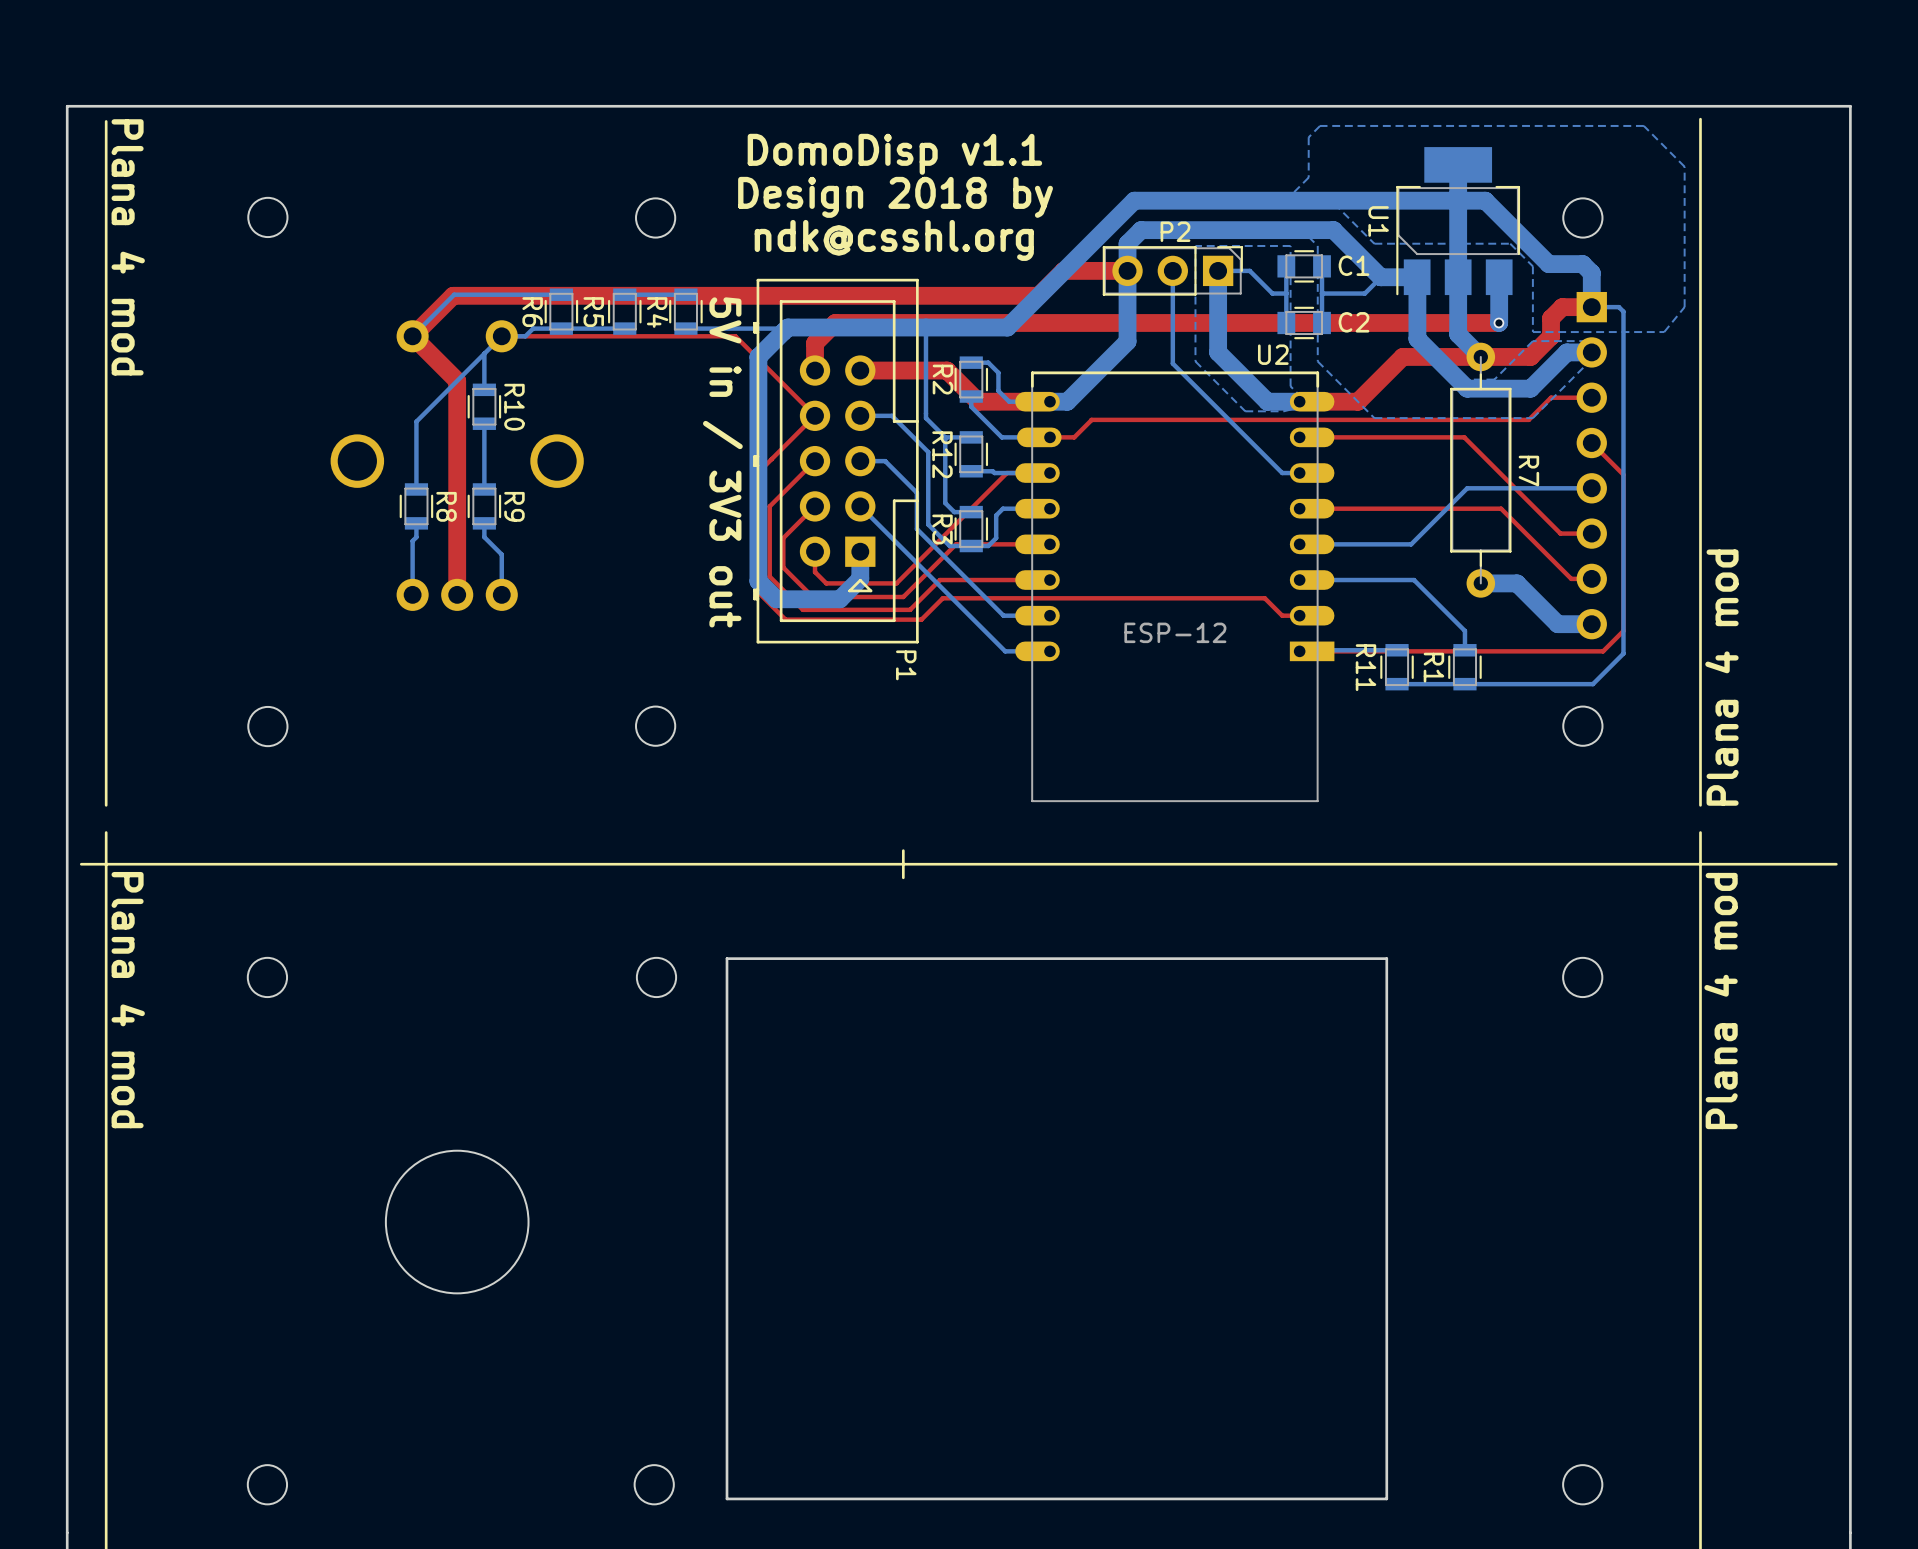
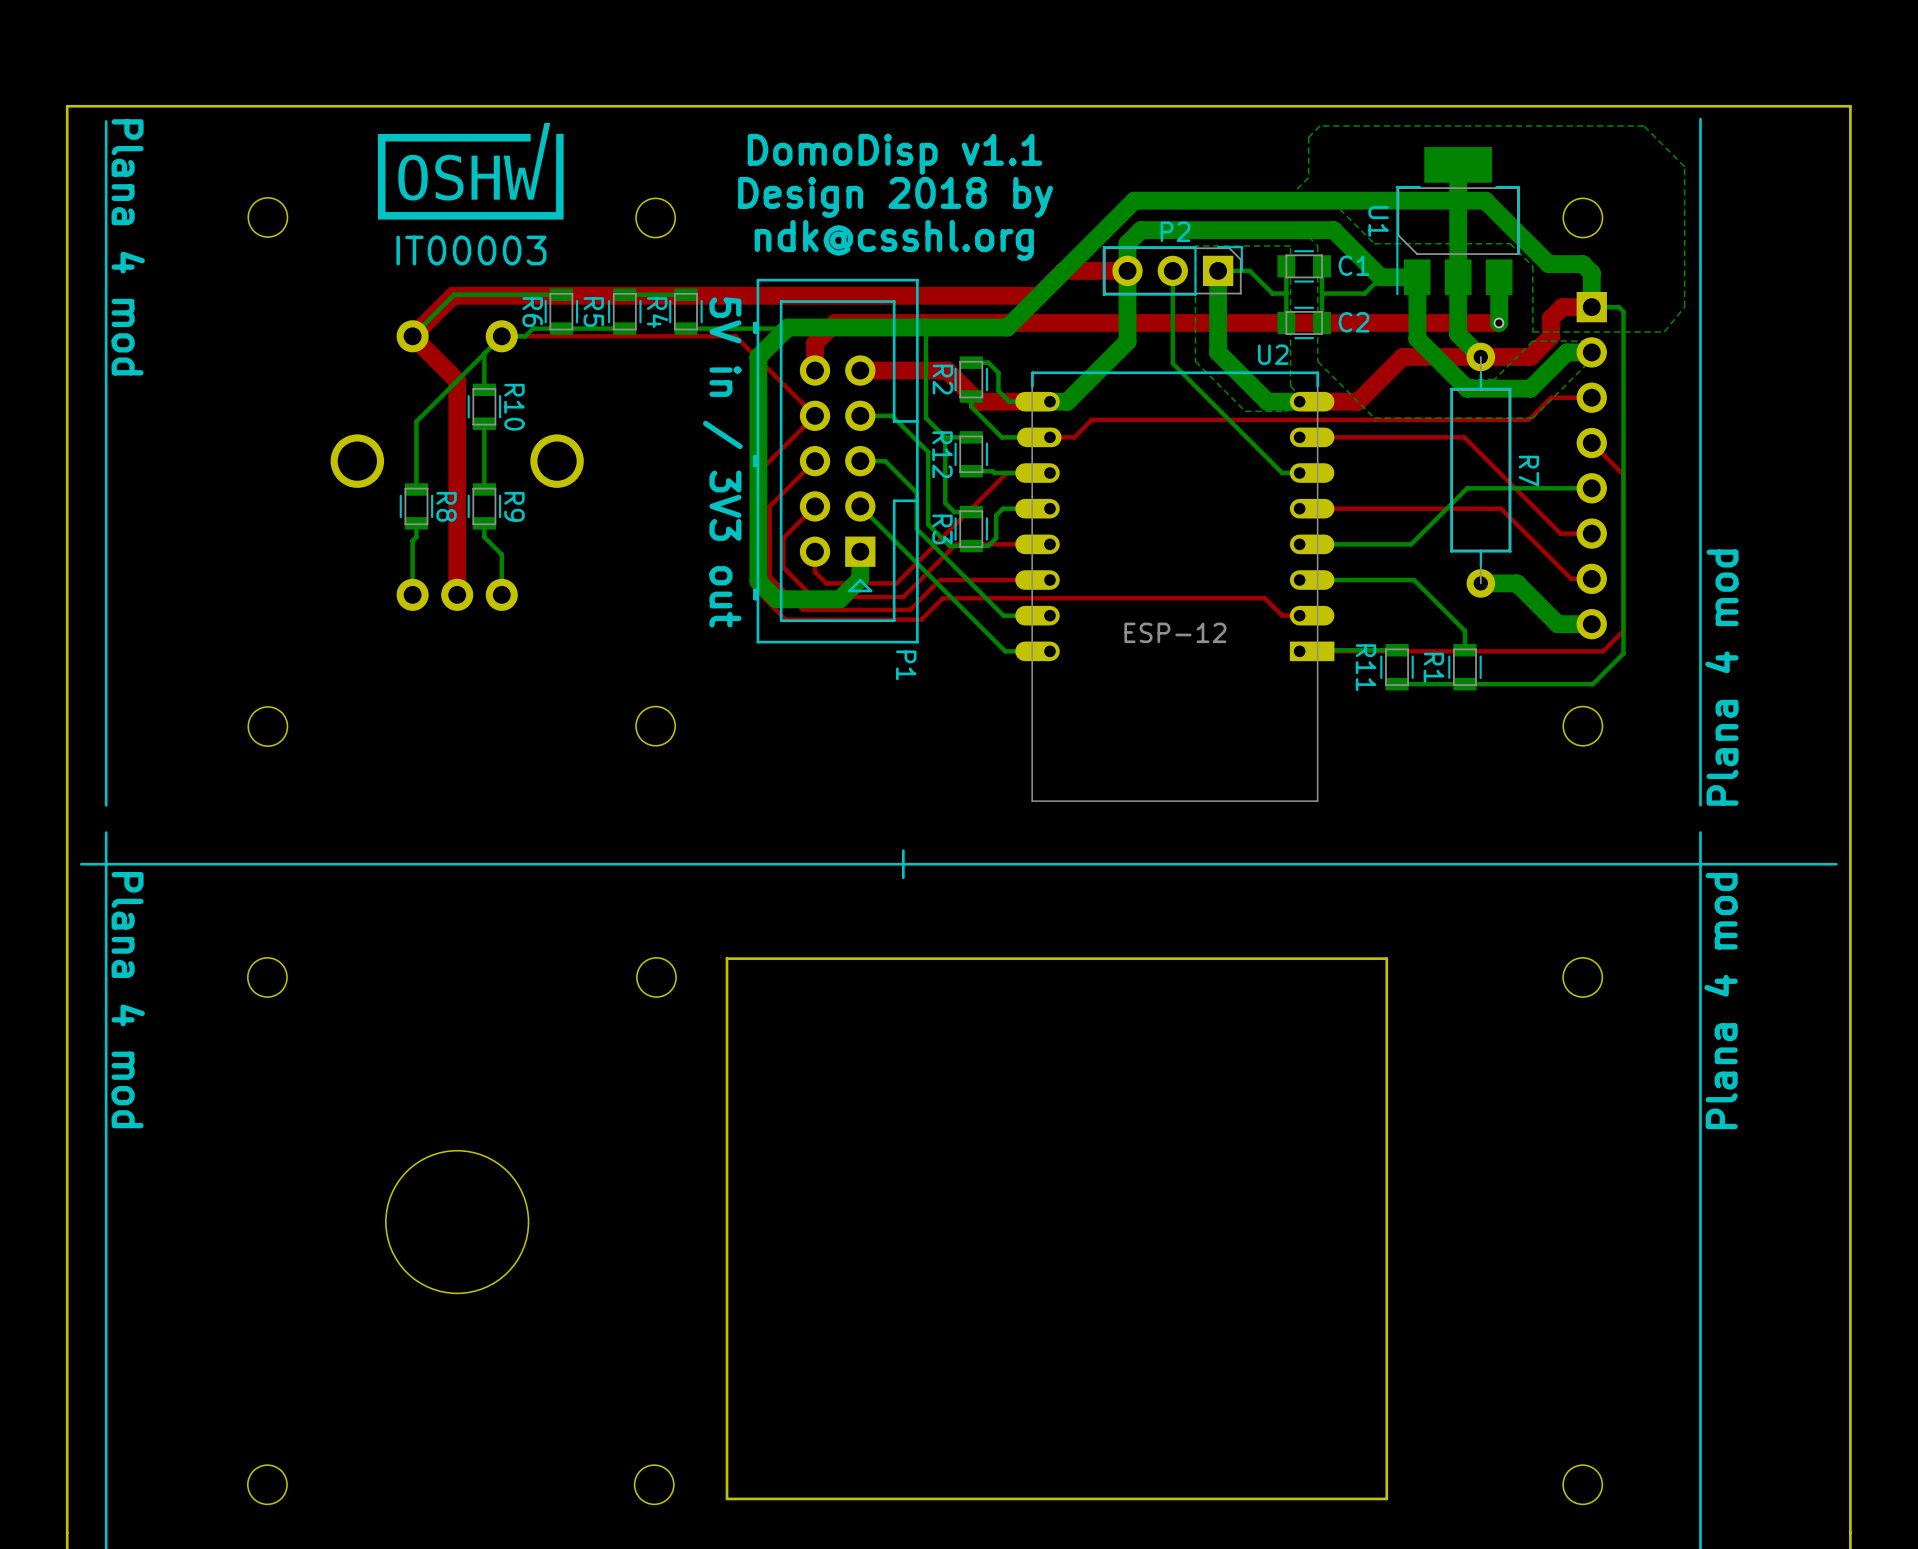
drawing: none -> [377, 122, 564, 220]

